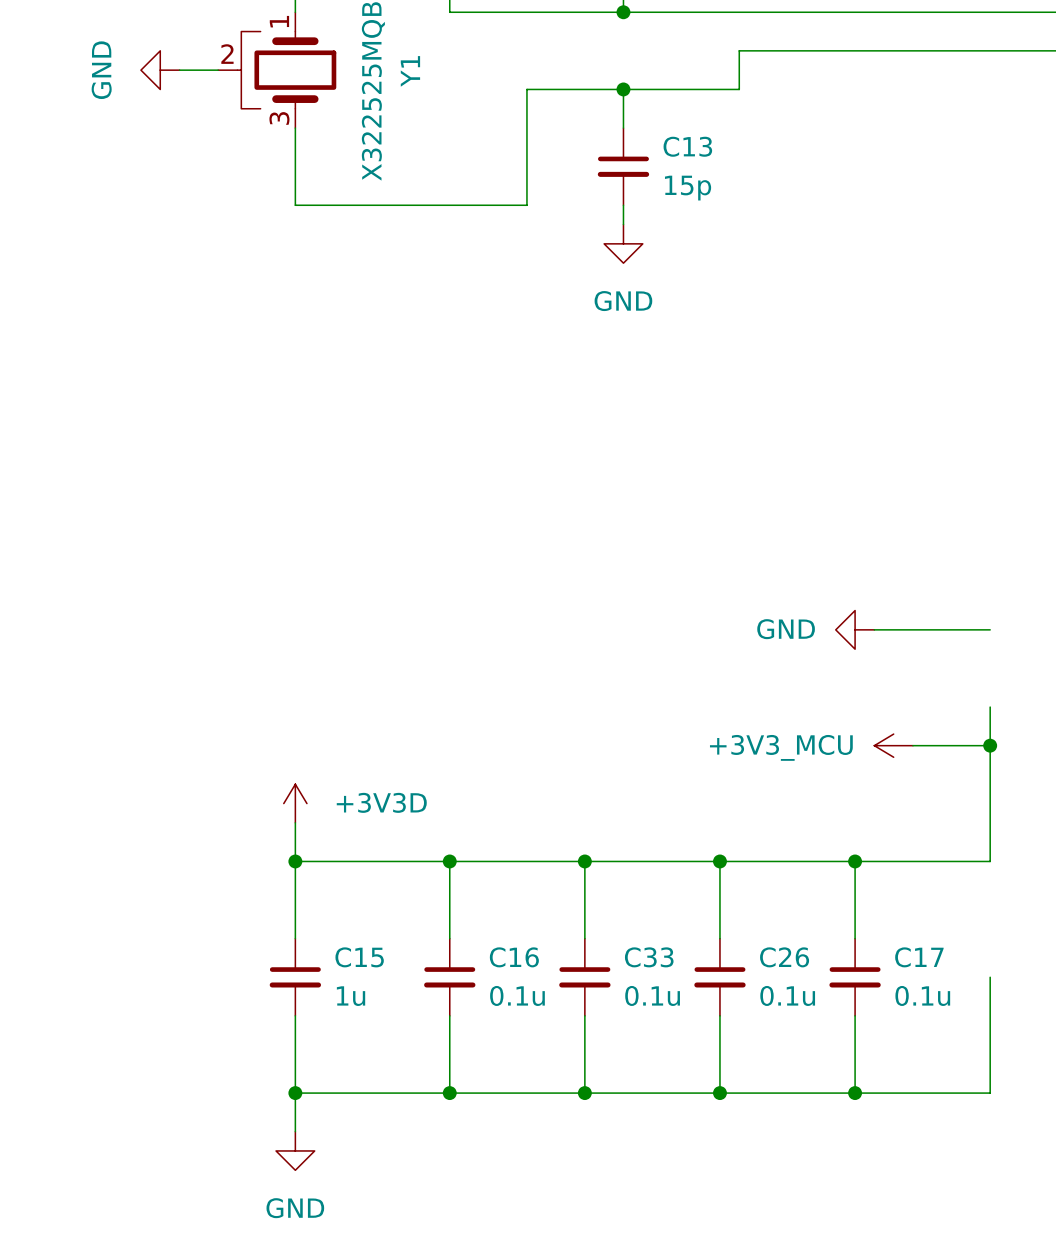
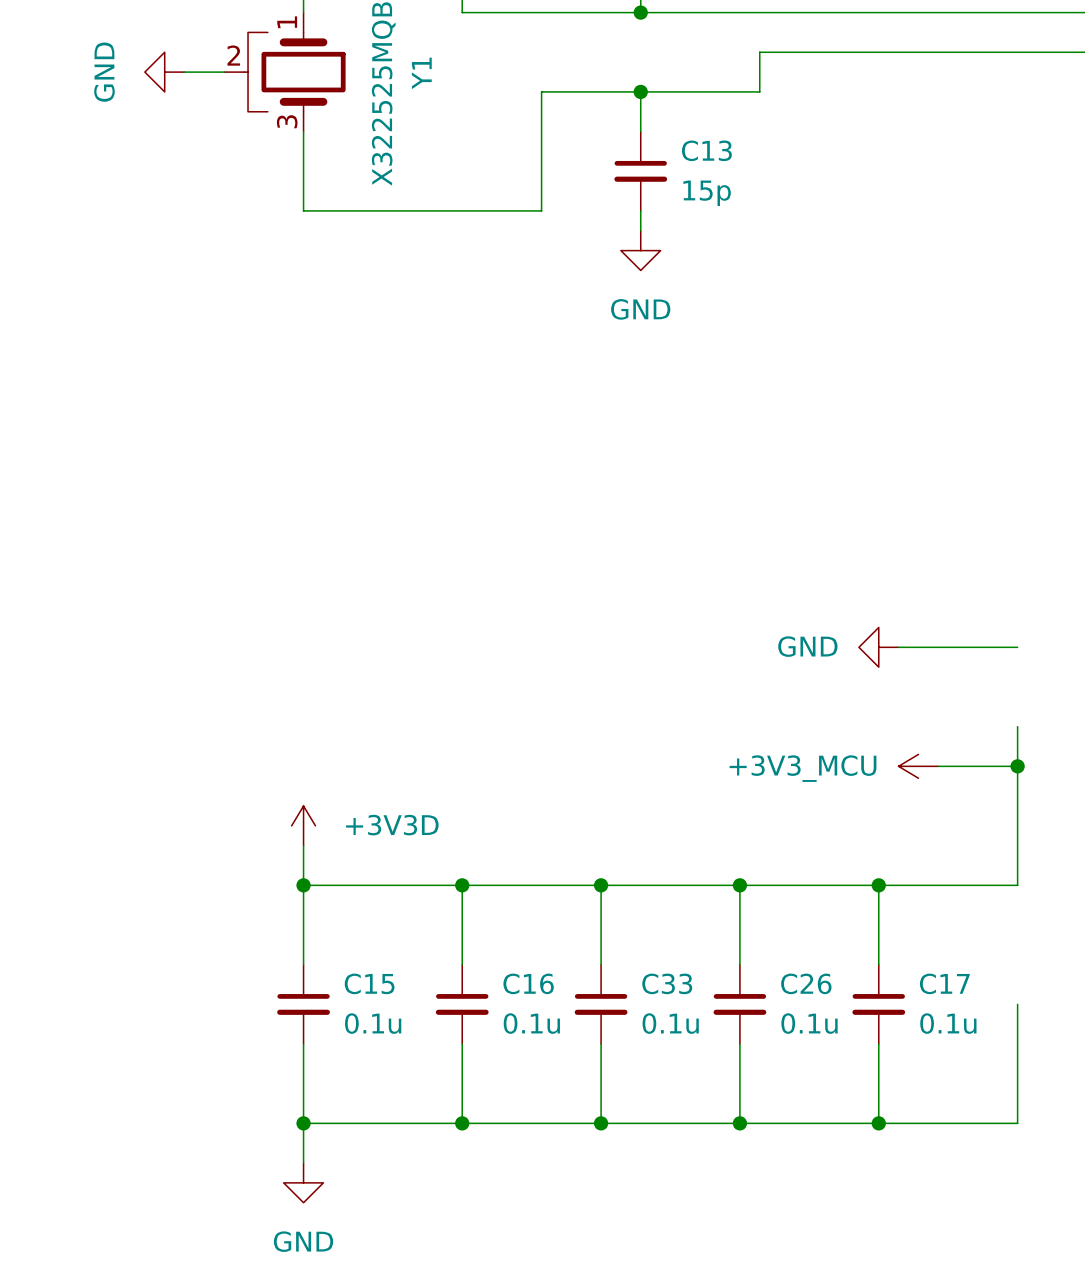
C15 value: 1u (351, 996) -> 0.1u (373, 1023)

